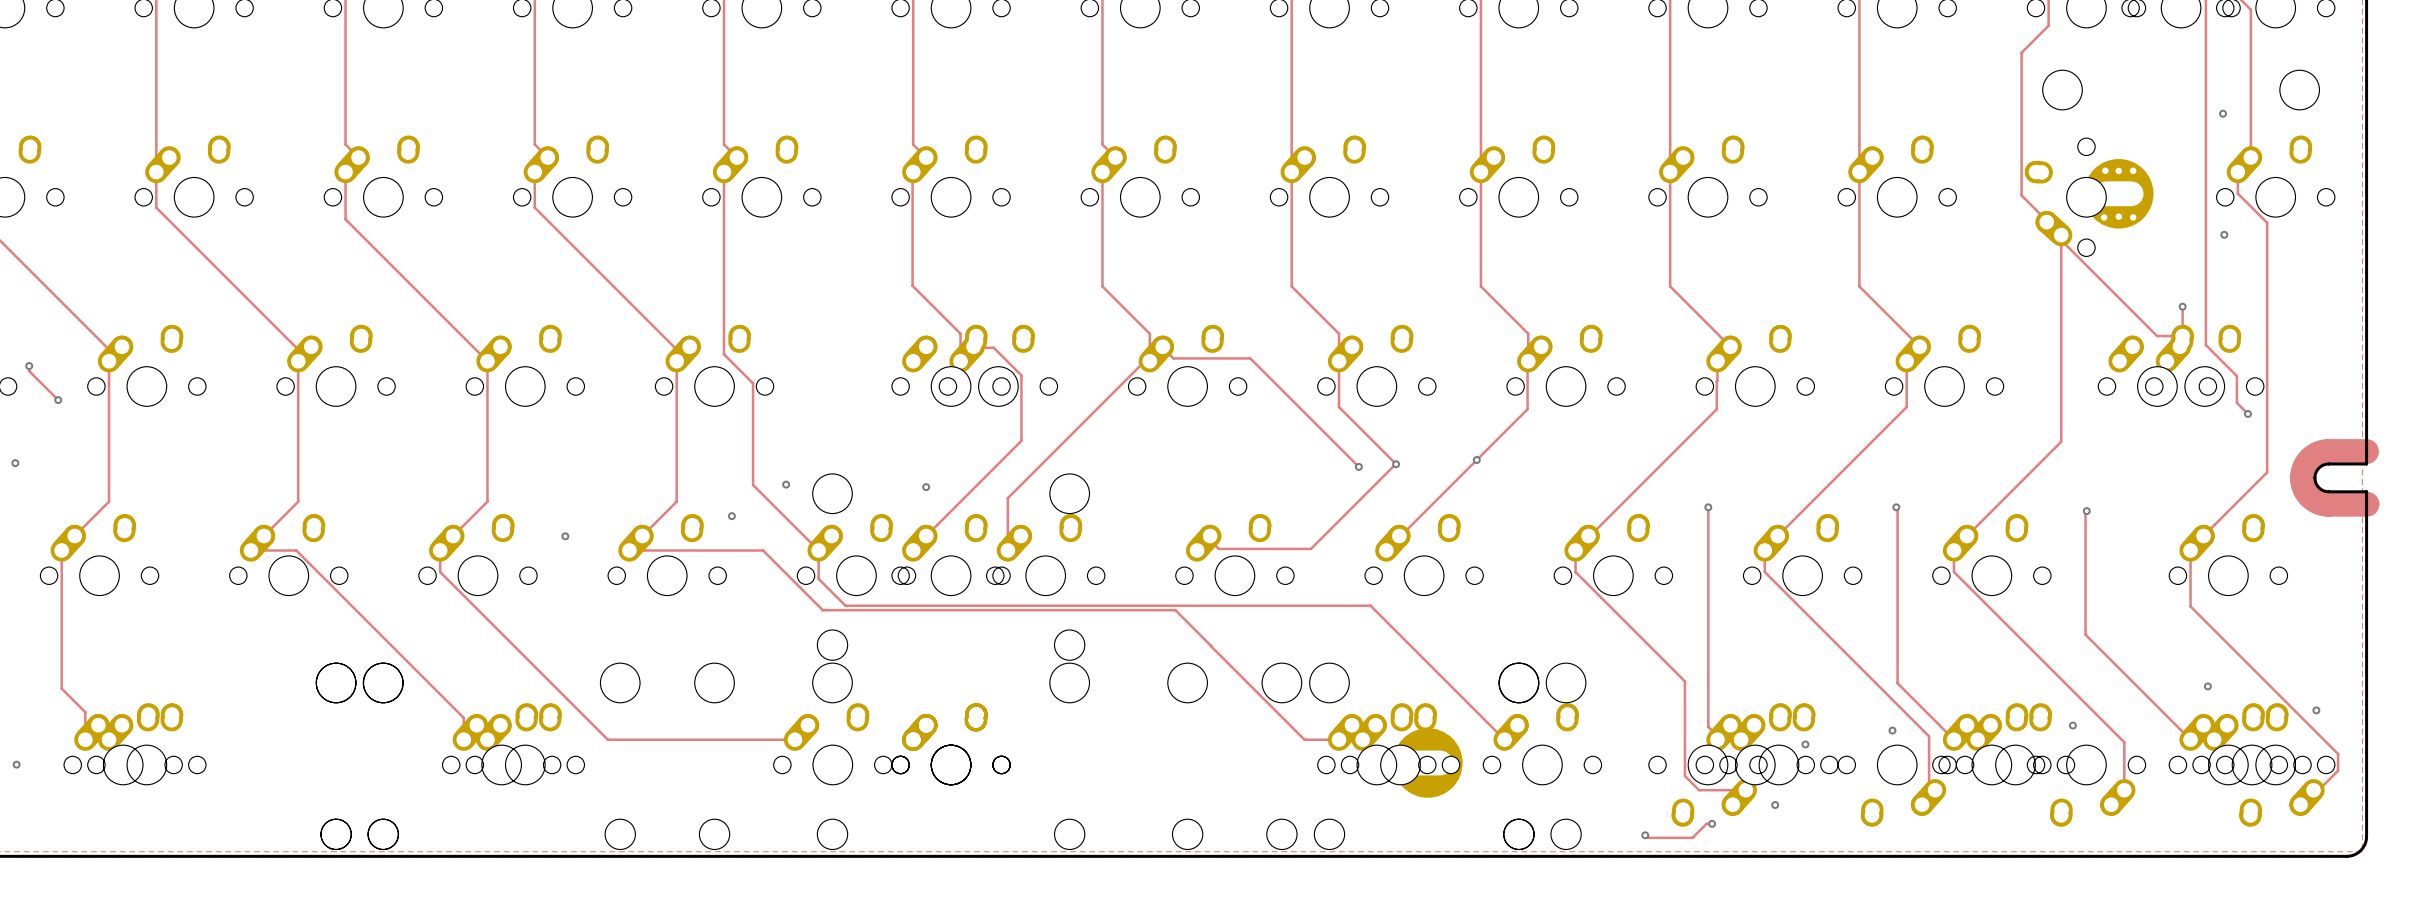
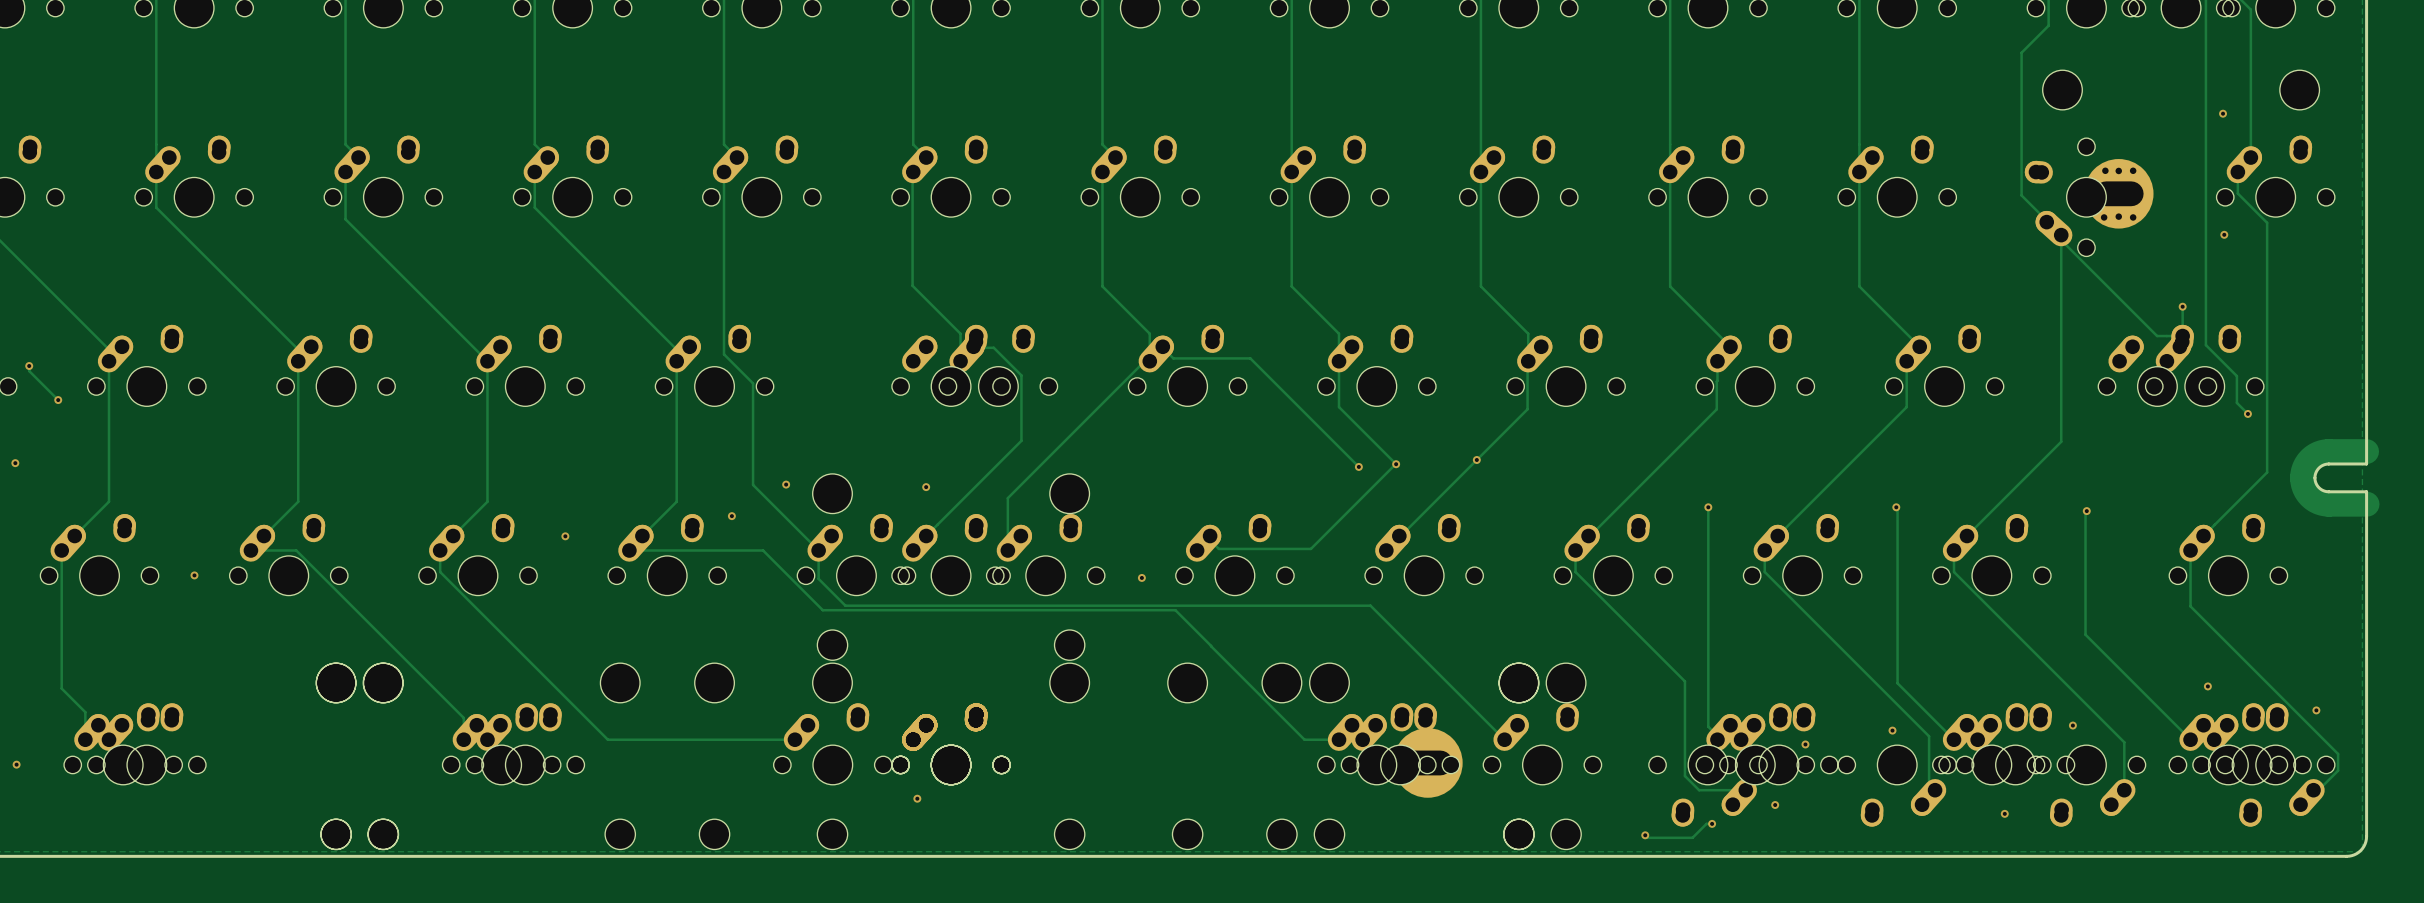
via: none -> (194, 575)
via: none -> (1141, 577)
via: none -> (917, 798)
via: none -> (2004, 813)

